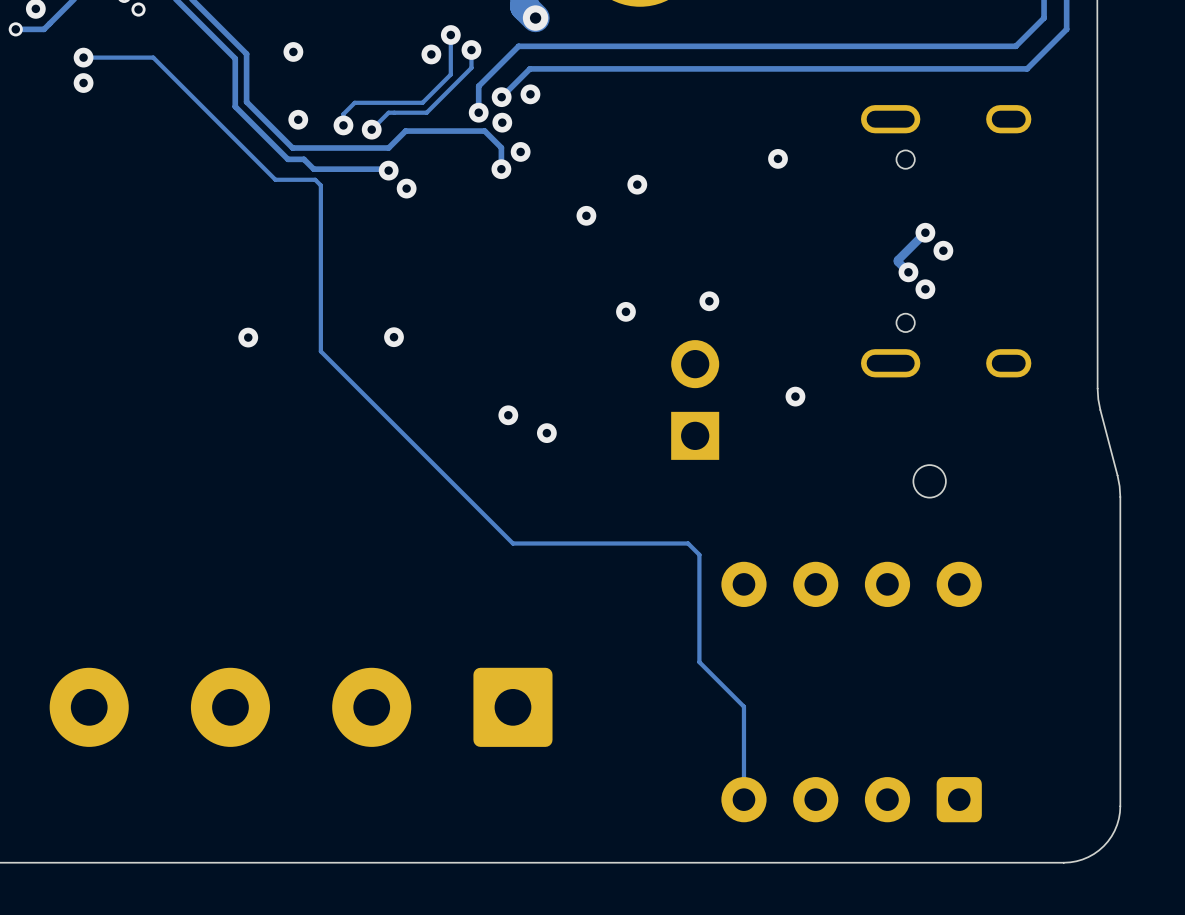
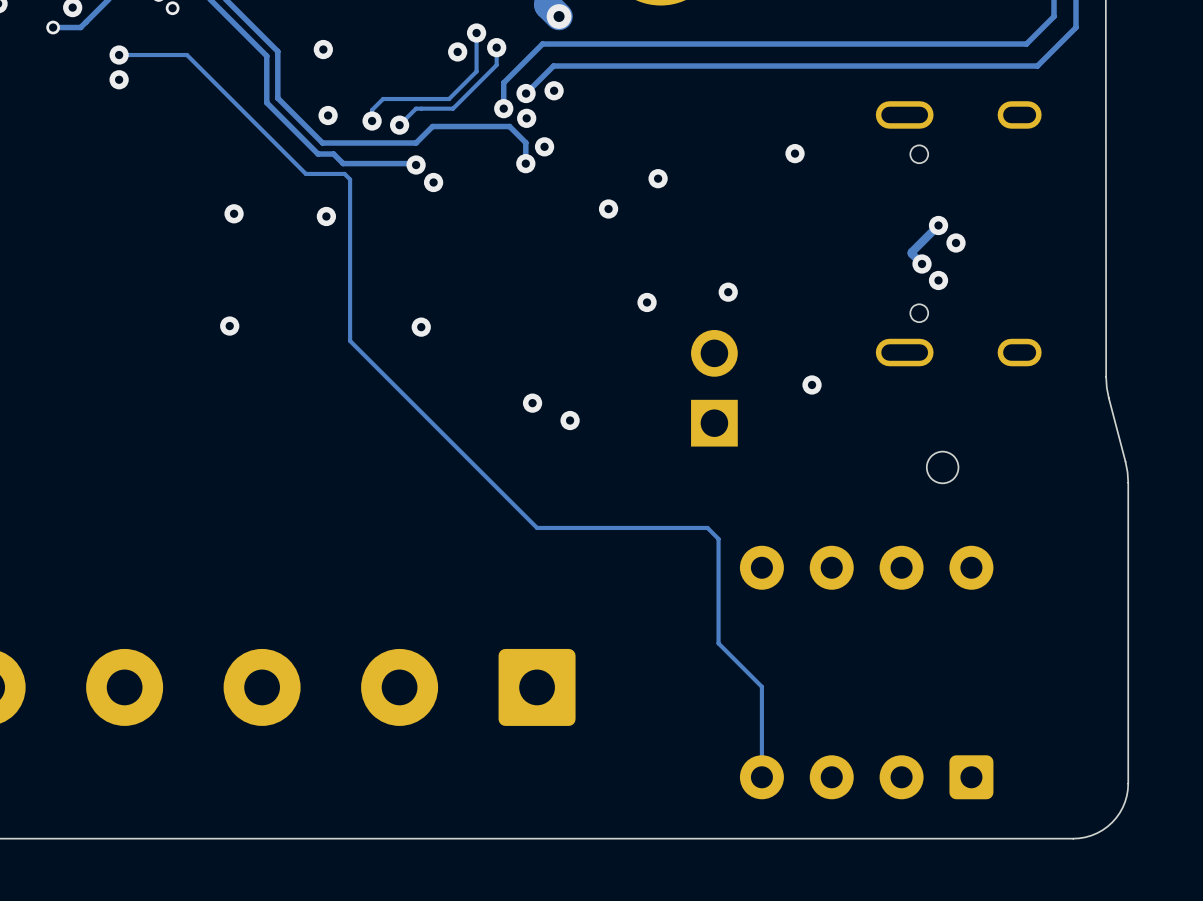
via: none -> (234, 213)
via: none -> (326, 216)
via position: (248, 337) -> (229, 326)

